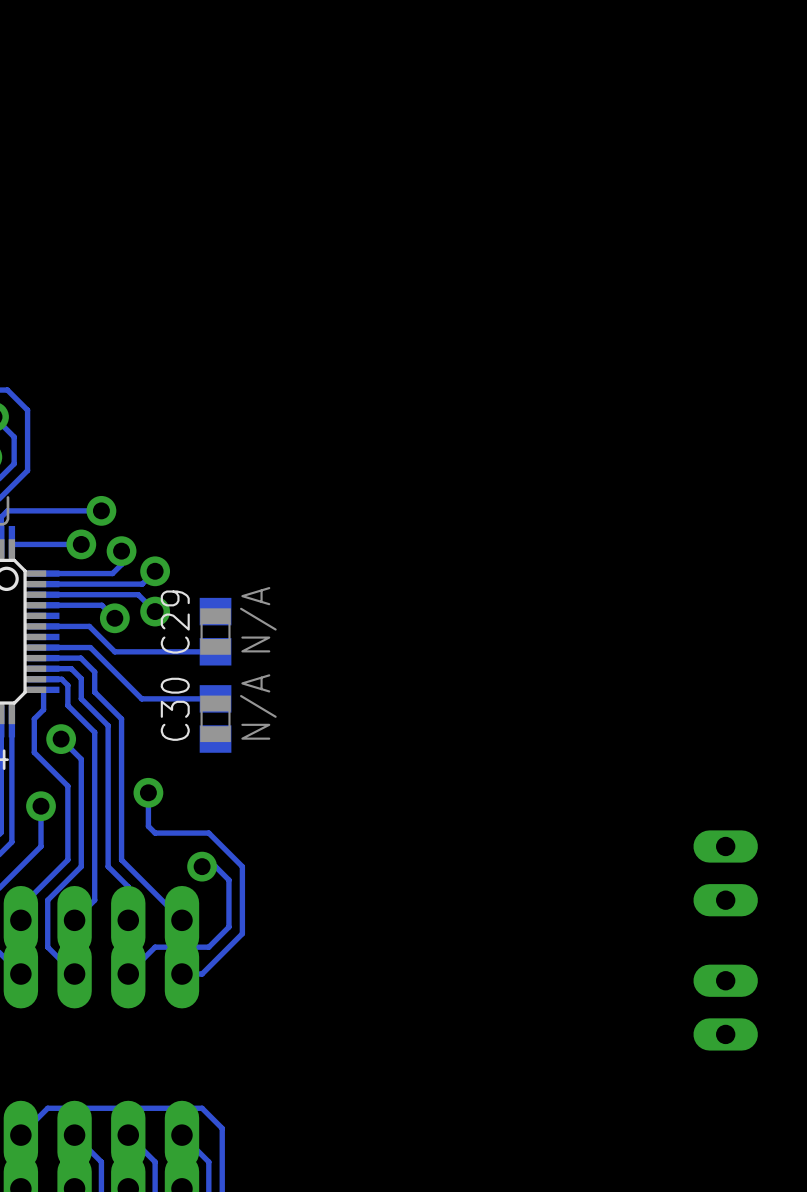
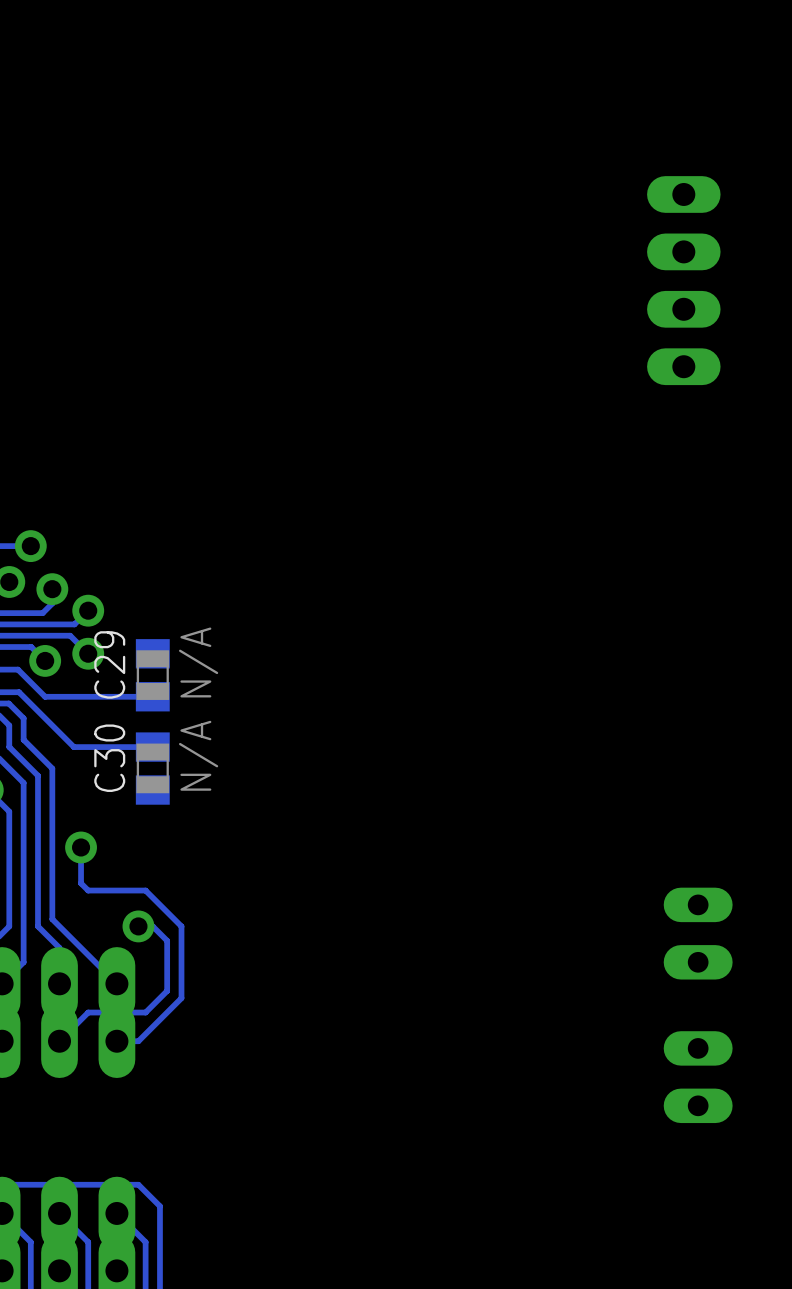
part: none -> (683, 280)

